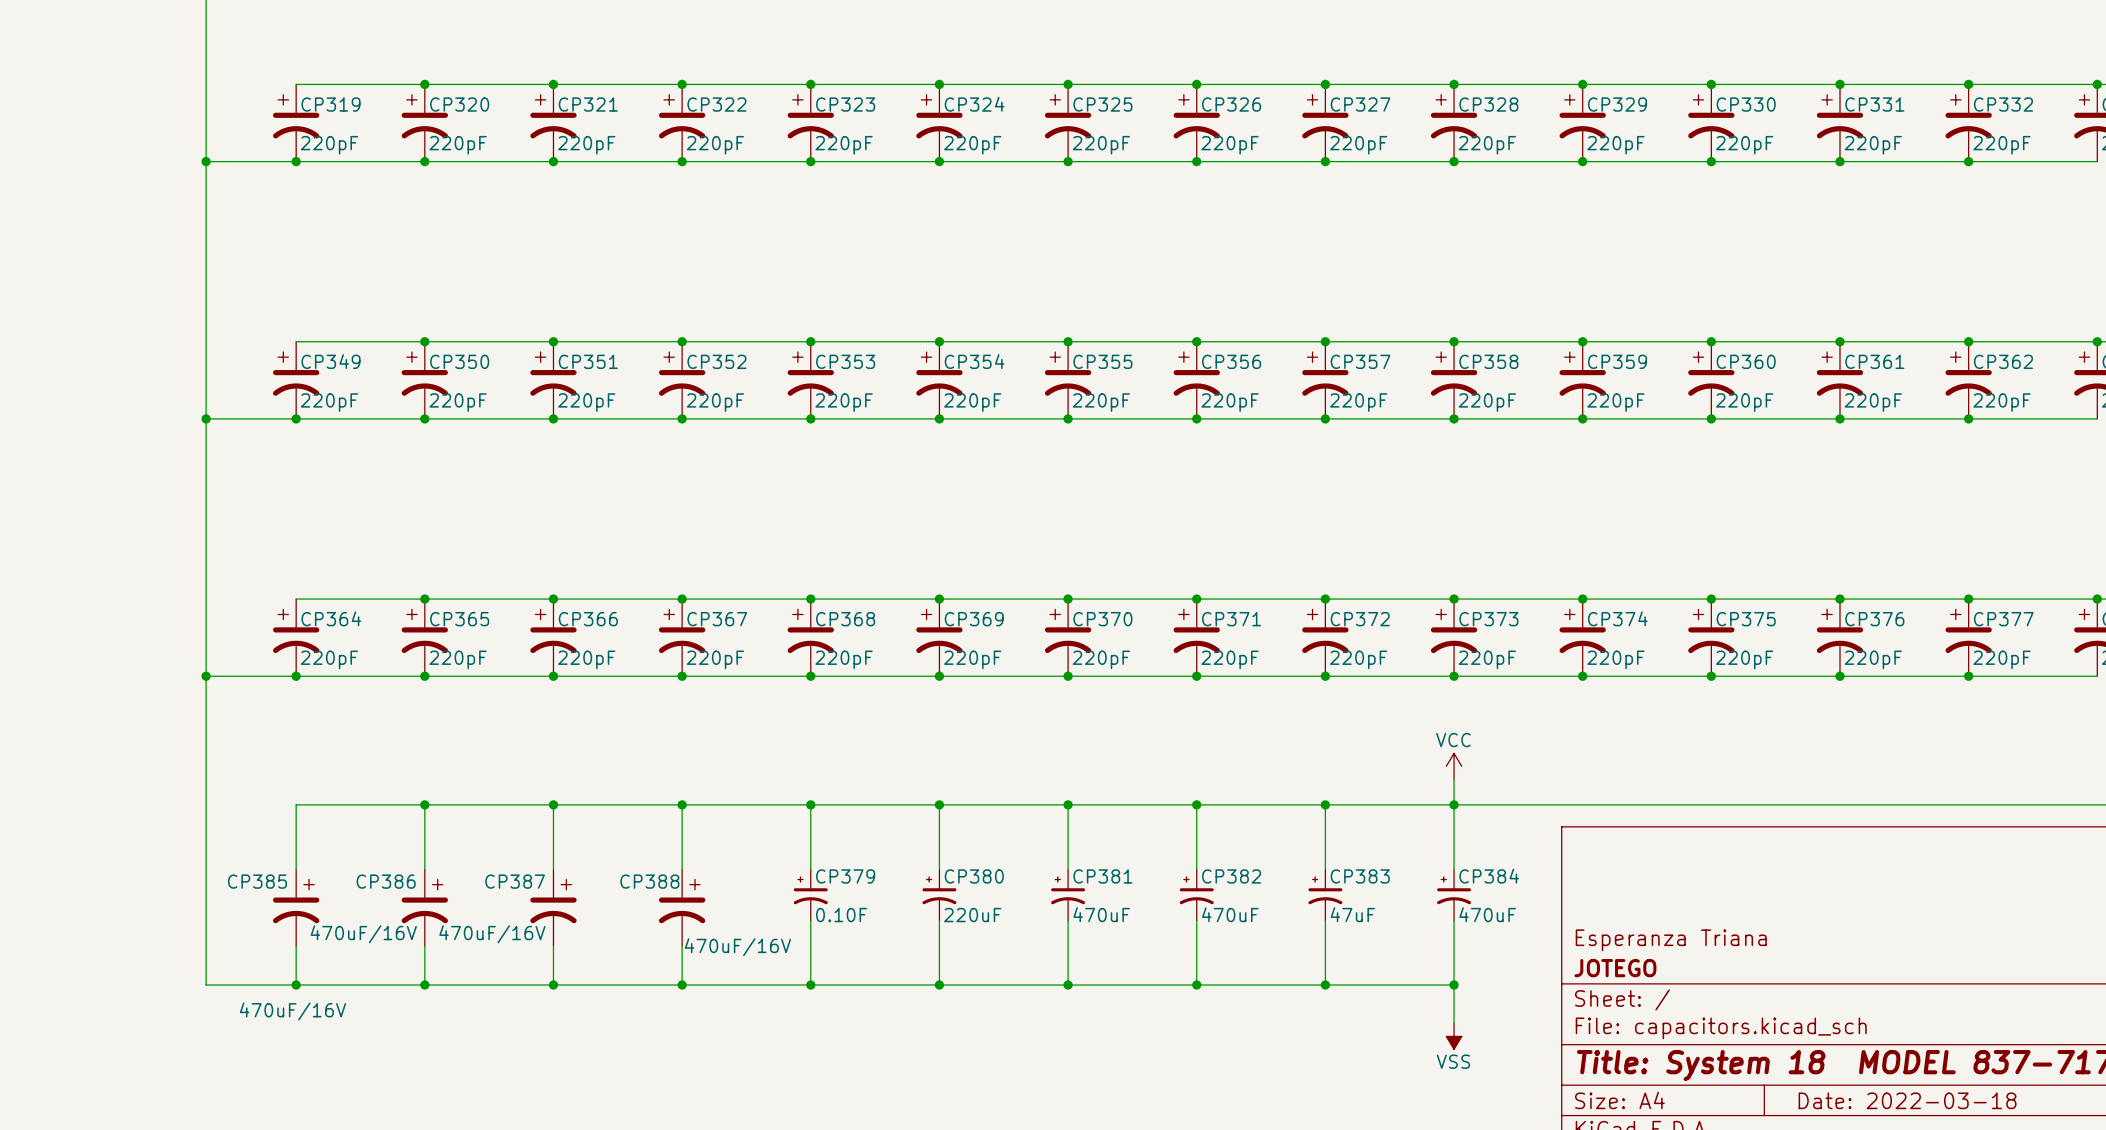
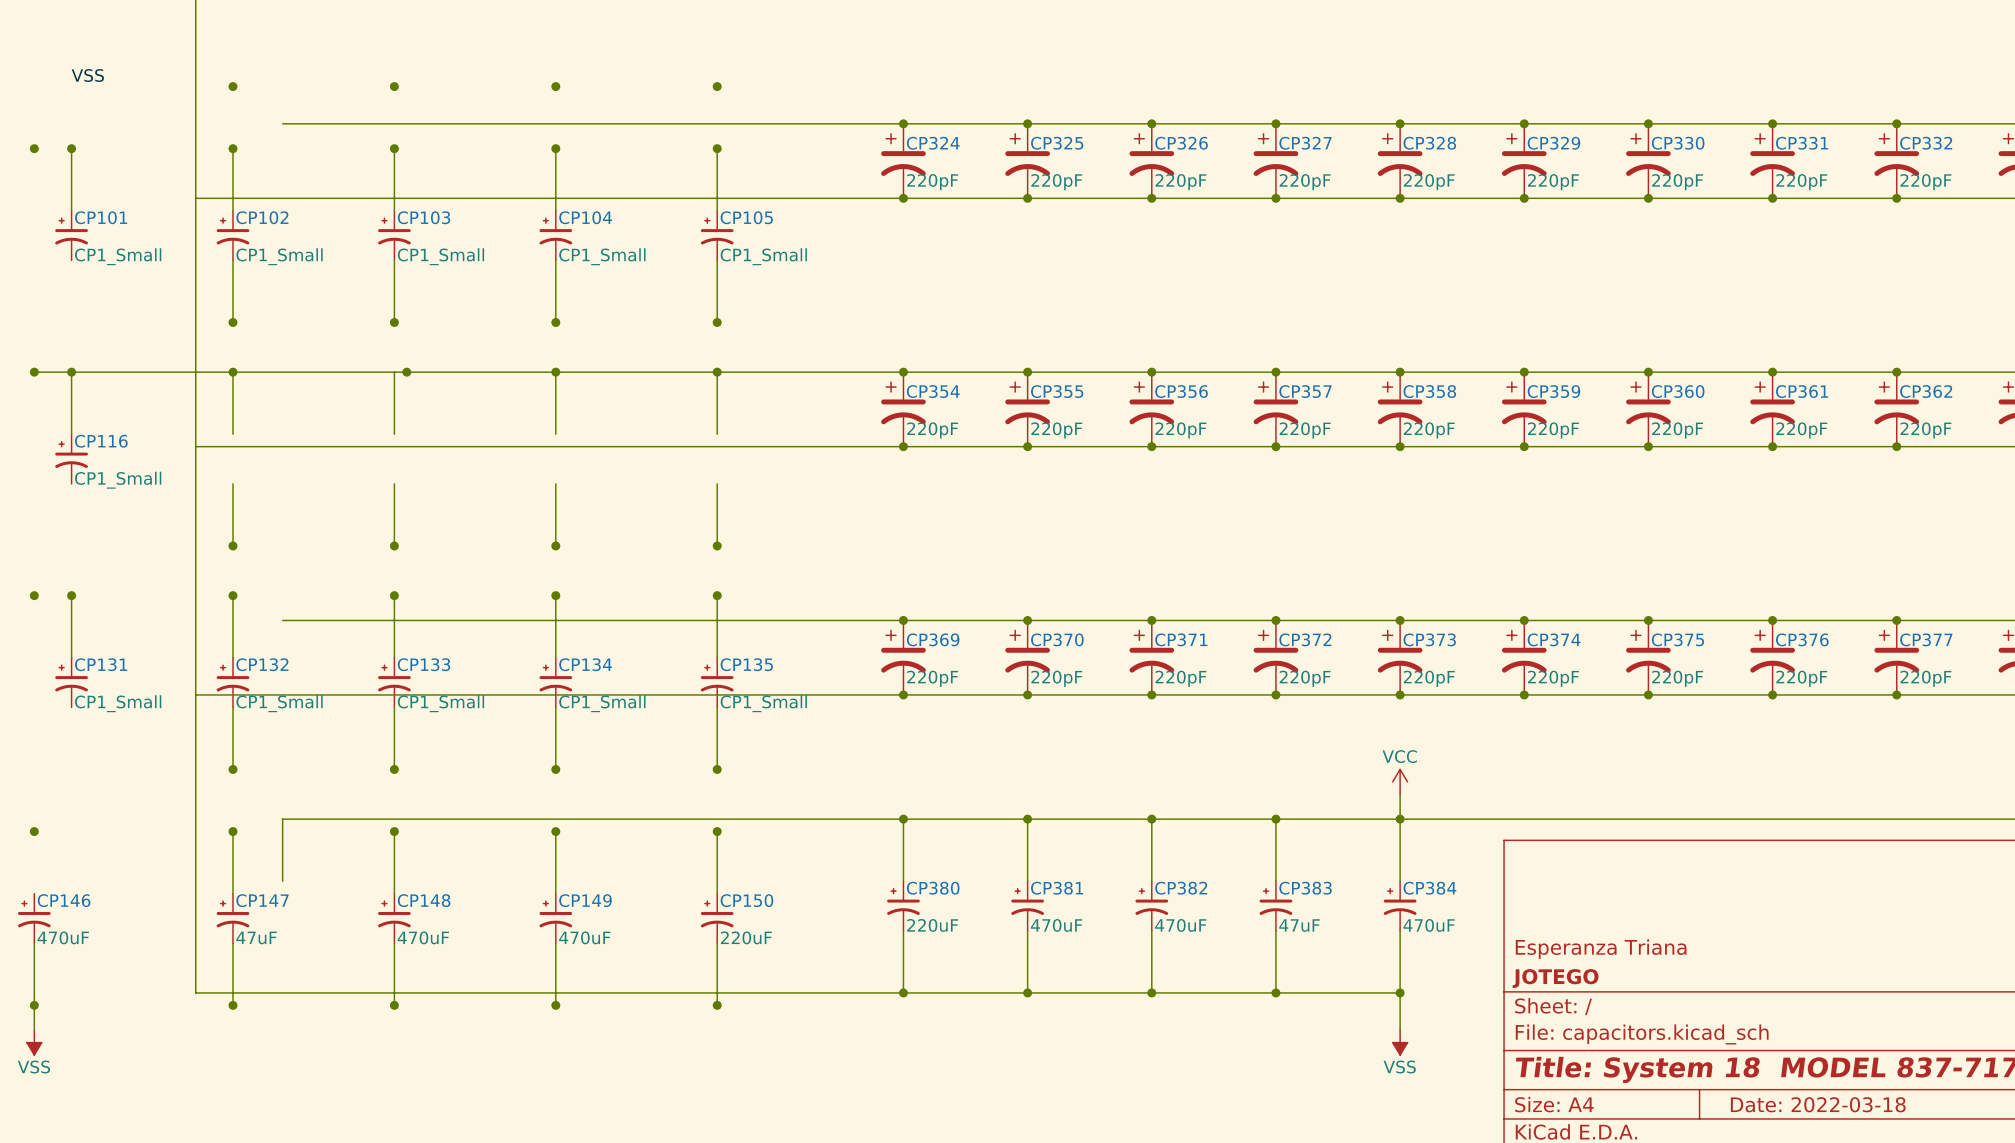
label: none -> VSS (87, 75)
junction: none -> (232, 86)
junction: none -> (394, 86)
junction: none -> (555, 86)
junction: none -> (717, 86)
junction: (424, 84) -> none
junction: (553, 84) -> none
junction: (682, 84) -> none
junction: (810, 84) -> none
junction: none -> (34, 148)
wire: none -> (71, 148) (71, 210)
junction: none -> (71, 148)
wire: none -> (232, 148) (232, 210)
junction: none -> (232, 148)
wire: none -> (394, 148) (394, 210)
junction: none -> (394, 148)
wire: none -> (555, 148) (555, 210)
junction: none -> (555, 148)
wire: none -> (717, 148) (717, 210)
junction: none -> (717, 148)
CP319: 220pF (296, 123) -> none
CP320: 220pF (424, 123) -> none
CP321: 220pF (553, 123) -> none
CP322: 220pF (682, 123) -> none
CP323: 220pF (810, 123) -> none
junction: (206, 161) -> none
junction: (296, 161) -> none
junction: (424, 161) -> none
junction: (553, 161) -> none
junction: (682, 161) -> none
junction: (810, 161) -> none
CP101: none -> CP1_Small (71, 235)
CP102: none -> CP1_Small (232, 235)
CP103: none -> CP1_Small (394, 235)
CP104: none -> CP1_Small (555, 235)
CP105: none -> CP1_Small (717, 235)
wire: none -> (232, 260) (232, 322)
wire: none -> (394, 260) (394, 322)
wire: none -> (555, 260) (555, 322)
wire: none -> (717, 260) (717, 322)
junction: none -> (232, 322)
junction: none -> (394, 322)
junction: none -> (555, 322)
junction: none -> (717, 322)
wire: none -> (34, 372) (282, 372)
junction: none -> (34, 372)
wire: none -> (71, 372) (71, 434)
junction: none -> (71, 372)
wire: none -> (232, 372) (232, 434)
junction: none -> (232, 372)
wire: none -> (394, 372) (394, 434)
junction position: (553, 341) -> (555, 372)
wire: none -> (555, 372) (555, 434)
junction: (682, 341) -> none
wire: none -> (717, 372) (717, 434)
junction: none -> (717, 372)
junction: (810, 341) -> none
CP349: 220pF (296, 380) -> none
CP350: 220pF (424, 380) -> none
CP351: 220pF (553, 380) -> none
CP352: 220pF (682, 380) -> none
CP353: 220pF (810, 380) -> none
junction: (206, 418) -> none
junction: (296, 418) -> none
junction: (424, 418) -> none
junction: (553, 418) -> none
junction: (682, 418) -> none
junction: (810, 418) -> none
CP116: none -> CP1_Small (71, 459)
wire: none -> (232, 483) (232, 545)
wire: none -> (394, 483) (394, 545)
wire: none -> (555, 483) (555, 545)
wire: none -> (717, 483) (717, 545)
junction: none -> (232, 545)
junction: none -> (394, 545)
junction: none -> (555, 545)
junction: none -> (717, 545)
junction: none -> (34, 595)
wire: none -> (71, 595) (71, 657)
junction: none -> (71, 595)
wire: none -> (232, 595) (232, 657)
junction: none -> (232, 595)
wire: none -> (394, 595) (394, 657)
wire: none -> (555, 595) (555, 657)
wire: none -> (717, 595) (717, 657)
junction: none -> (717, 595)
junction position: (424, 599) -> (394, 595)
junction position: (553, 599) -> (555, 595)
junction: (682, 599) -> none
junction: (810, 599) -> none
CP364: 220pF (296, 637) -> none
CP365: 220pF (424, 637) -> none
CP366: 220pF (553, 637) -> none
CP367: 220pF (682, 637) -> none
CP368: 220pF (810, 637) -> none
CP131: none -> CP1_Small (71, 682)
CP132: none -> CP1_Small (232, 682)
CP133: none -> CP1_Small (394, 682)
CP134: none -> CP1_Small (555, 682)
CP135: none -> CP1_Small (717, 682)
junction: (206, 676) -> none
junction: (296, 676) -> none
junction: (424, 676) -> none
junction: (553, 676) -> none
junction: (682, 676) -> none
junction: (810, 676) -> none
wire: none -> (232, 707) (232, 769)
wire: none -> (394, 707) (394, 769)
wire: none -> (555, 707) (555, 769)
junction: none -> (232, 769)
junction: none -> (394, 769)
junction: none -> (555, 769)
junction: none -> (717, 769)
wire: (424, 804) (424, 869) -> (394, 831) (394, 893)
junction position: (424, 804) -> (394, 831)
wire: (553, 804) (553, 869) -> (555, 831) (555, 893)
junction: (553, 804) -> none
wire: (682, 804) (682, 869) -> (717, 707) (717, 769)
junction: (682, 804) -> none
wire: (810, 804) (810, 869) -> (717, 831) (717, 893)
junction: (810, 804) -> none
junction: none -> (34, 831)
wire: none -> (232, 831) (232, 893)
junction: none -> (232, 831)
junction: none -> (555, 831)
junction: none -> (717, 831)
CP379: 0.10F (810, 894) -> none
CP146: none -> 470uF (34, 918)
CP147: none -> 47uF (232, 918)
CP385: 470uF/16V (296, 907) -> none
CP148: none -> 470uF (394, 918)
CP386: 470uF/16V (424, 907) -> none
CP387: 470uF/16V (553, 907) -> none
CP149: none -> 470uF (555, 918)
CP388: 470uF/16V (682, 907) -> none
CP150: none -> 220uF (717, 918)
wire: (810, 920) (810, 985) -> (717, 943) (717, 1005)
wire: none -> (34, 943) (34, 1030)
wire: none -> (232, 943) (232, 1005)
wire: none -> (394, 943) (394, 1005)
wire: none -> (555, 943) (555, 1005)
wire: (296, 946) (296, 985) -> none
wire: (424, 946) (424, 985) -> none
wire: (553, 946) (553, 985) -> none
wire: (682, 946) (682, 985) -> none
junction position: (296, 985) -> (232, 1005)
junction position: (424, 985) -> (394, 1005)
junction position: (553, 985) -> (555, 1005)
junction: (682, 985) -> none
junction: (810, 985) -> none
junction: none -> (34, 1005)
junction: none -> (717, 1005)
power symbol: none -> VSS (34, 1042)

